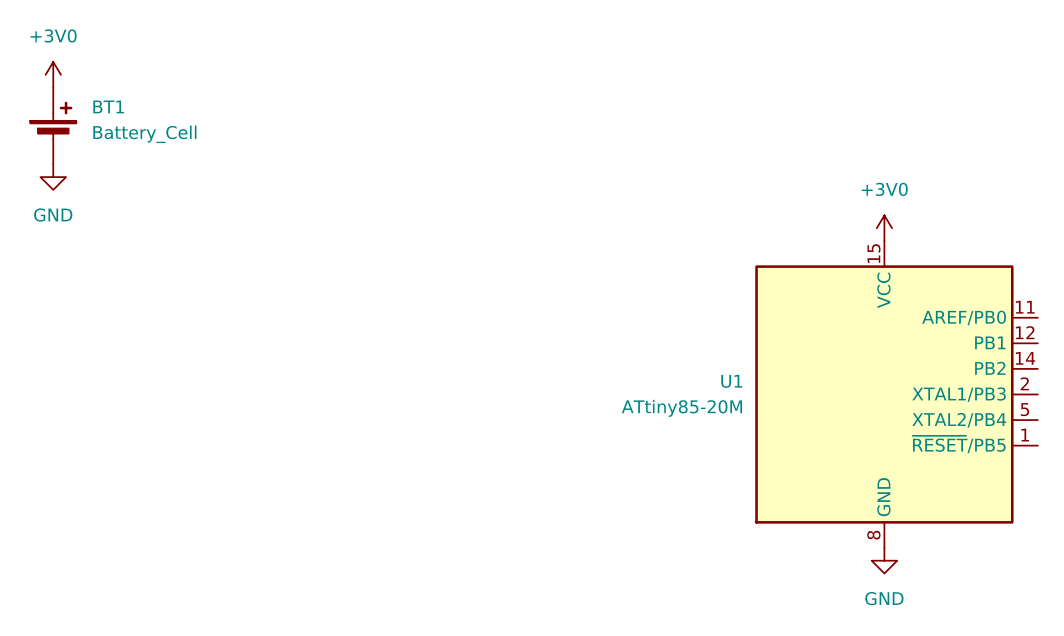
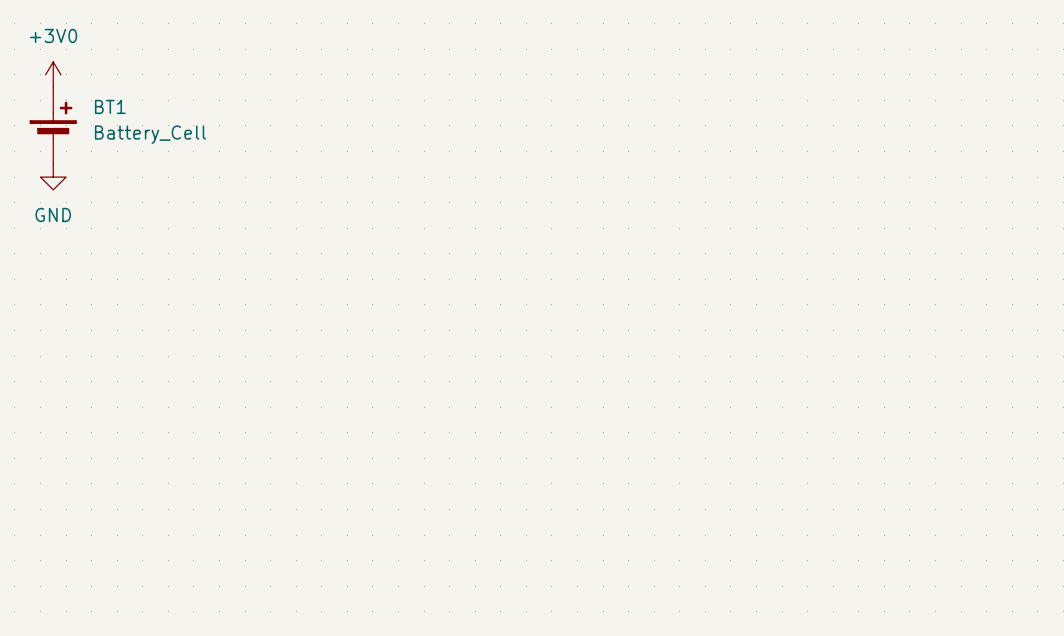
power symbol: +3V0 (884, 228) -> none
U1: ATtiny85-20M (896, 394) -> none
power symbol: GND (884, 560) -> none

